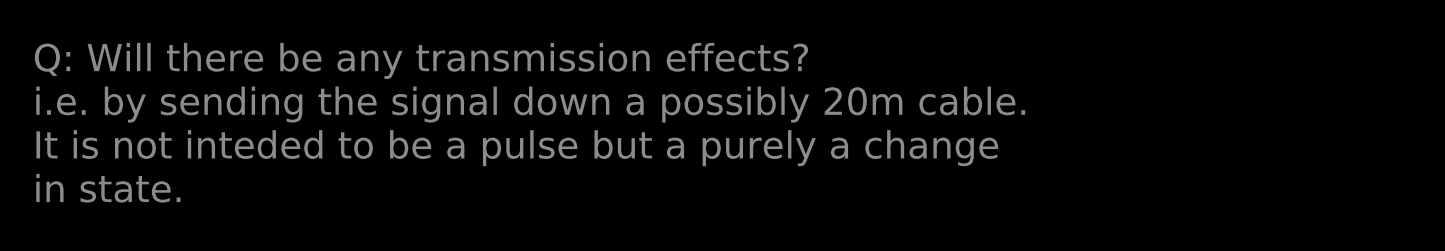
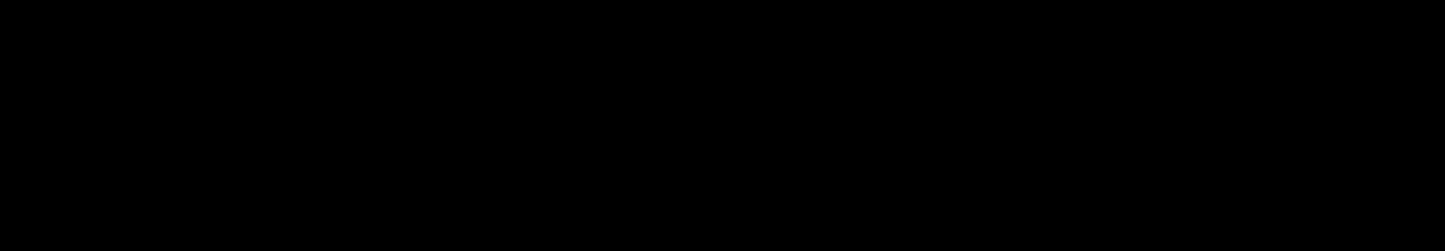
text: Q: Will there be any transmission effects? (421, 60) -> none
text: i.e. by sending the signal down a possibly 20m cable. (530, 104) -> none
text: It is not inteded to be a pulse but a purely a change (517, 148) -> none
text: in state. (108, 188) -> none

